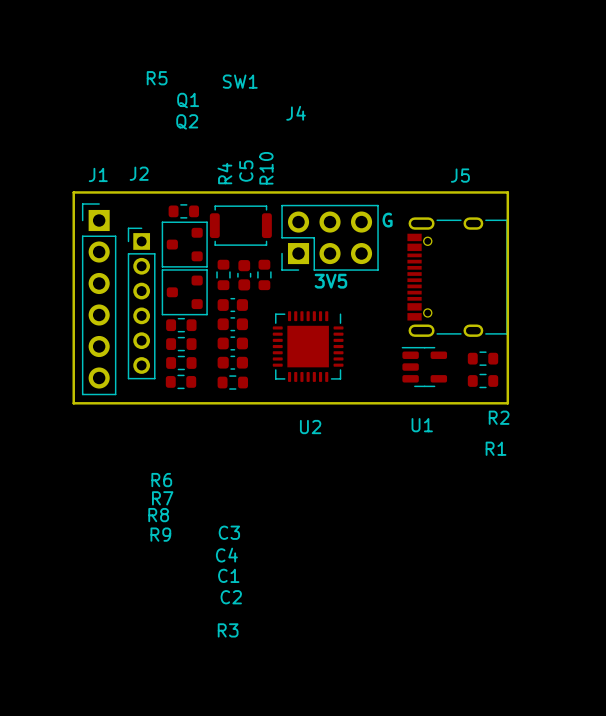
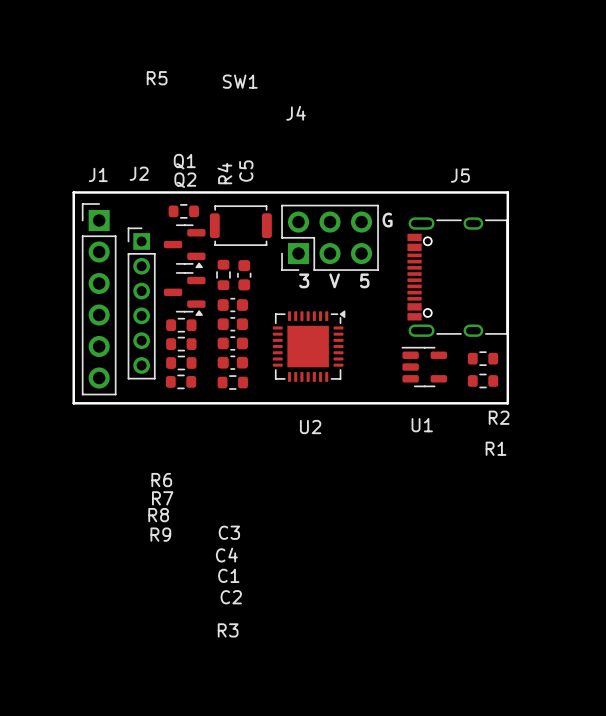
Q1 name position: Q1 (188, 100) -> Q1 (184, 161)
Q2 name position: Q2 (187, 121) -> Q2 (185, 180)
Q1 footprint: [161, 221, 208, 268] -> [163, 224, 206, 269]
Q2 footprint: [161, 269, 208, 316] -> [163, 272, 206, 316]
R10: (264, 274) -> none
text: none -> 3 V 5 (334, 280)
text: 3V5 (330, 281) -> none
U2 footprint: [272, 311, 344, 382] -> [272, 310, 346, 382]

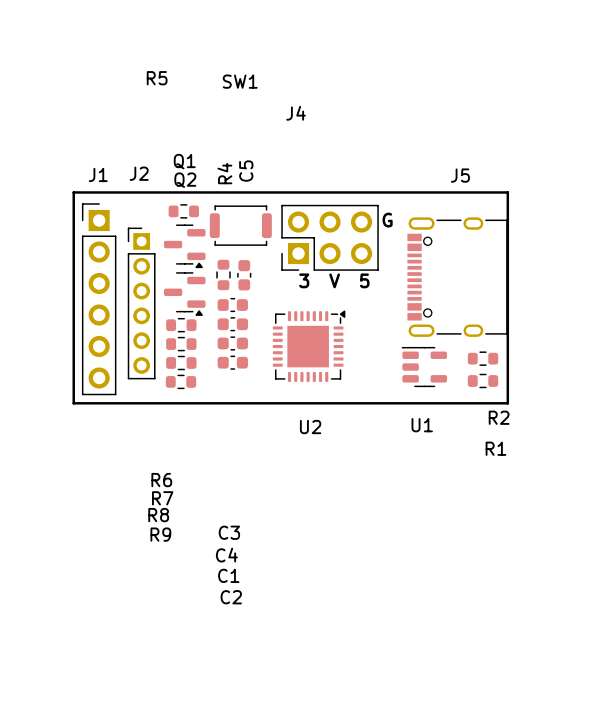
R3: (232, 382) -> none

